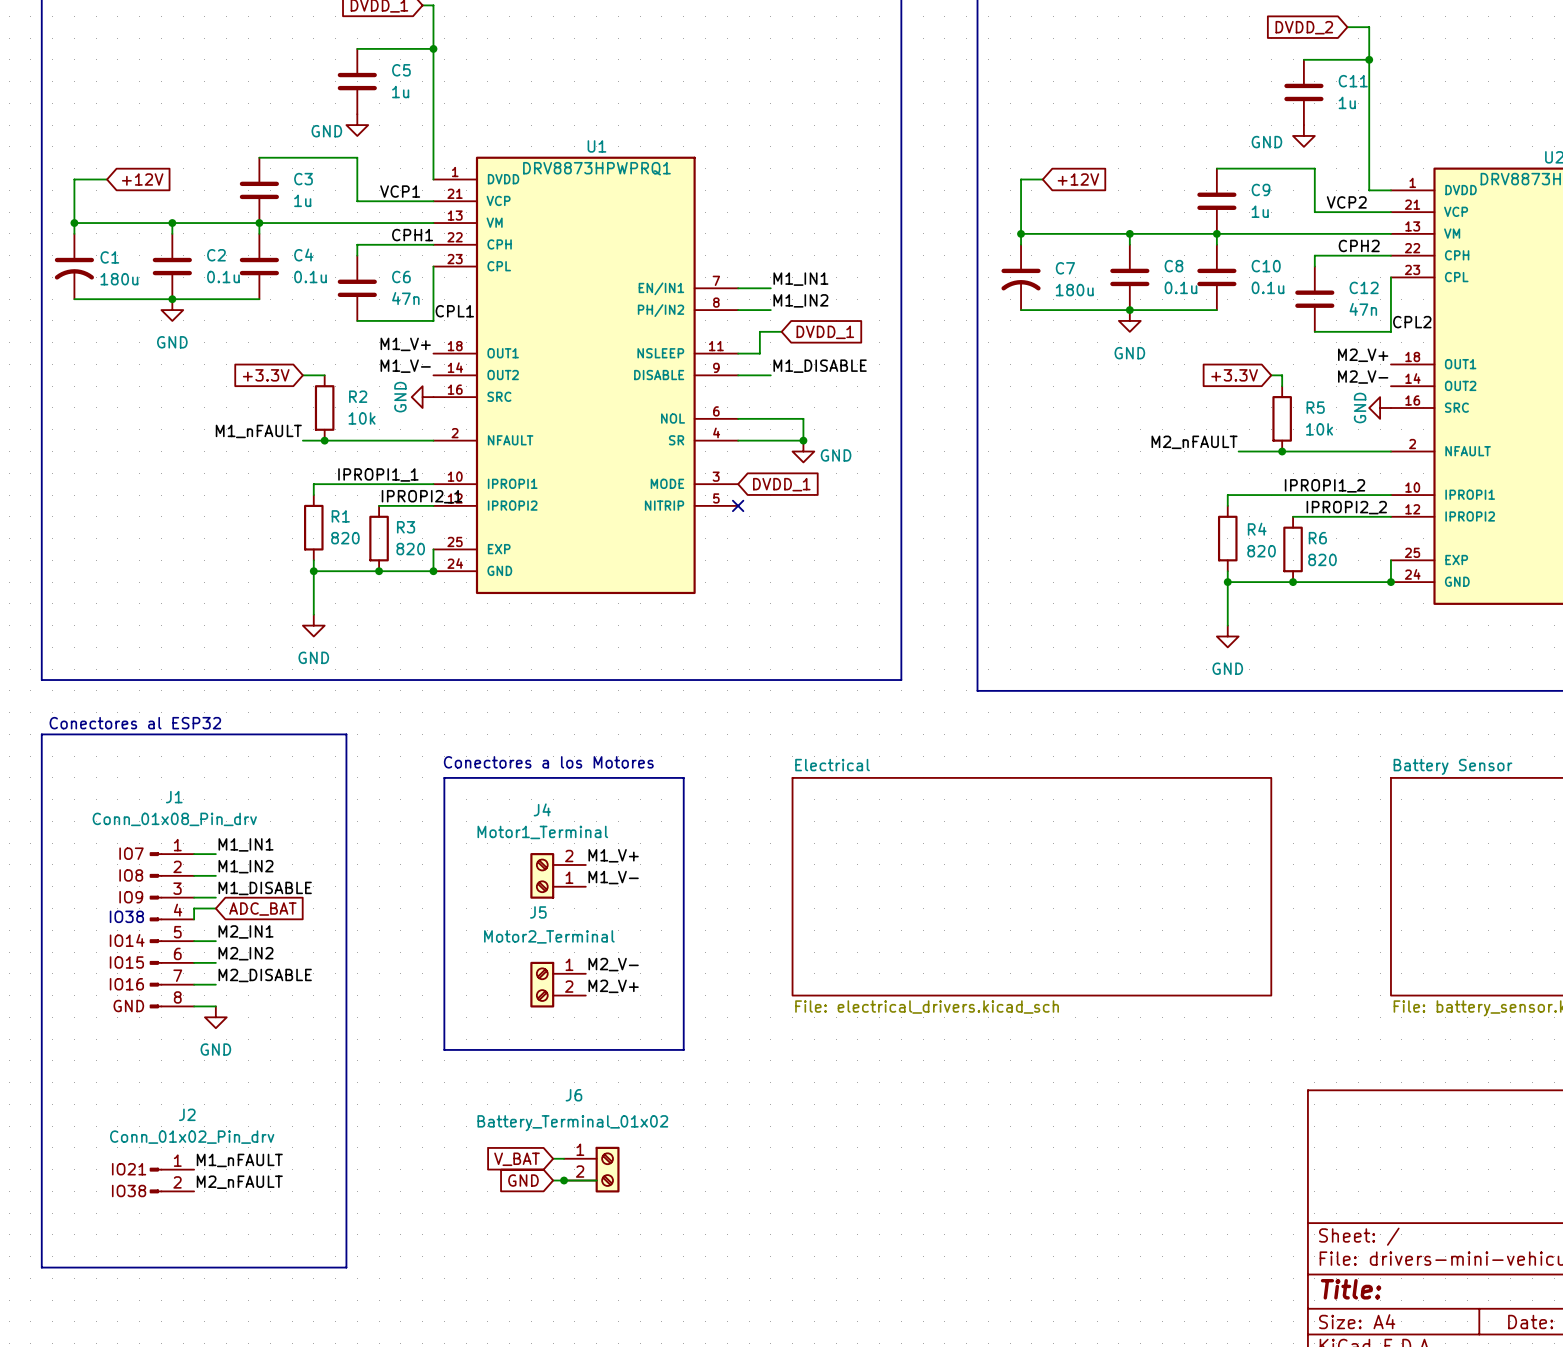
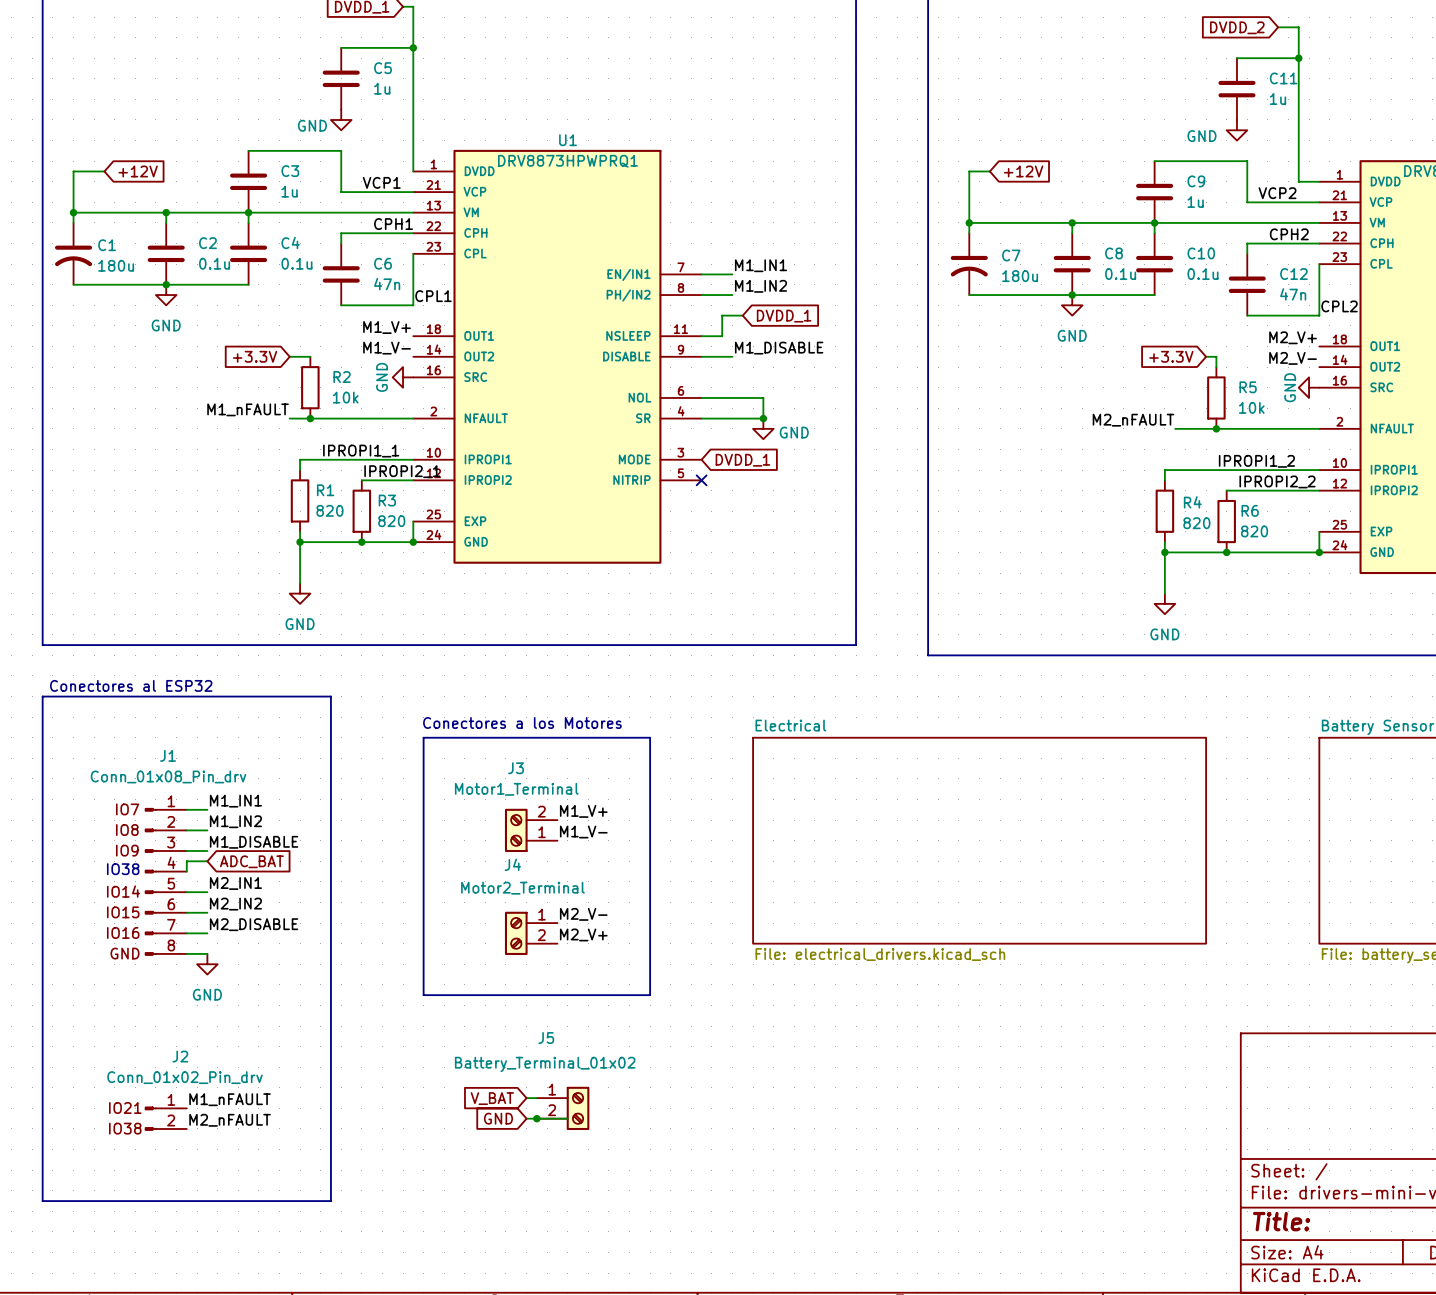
J4 name: J4 (542, 809) -> J3 (516, 768)
J5 name: J5 (538, 912) -> J4 (512, 864)
J6 name: J6 (573, 1095) -> J5 (546, 1038)

